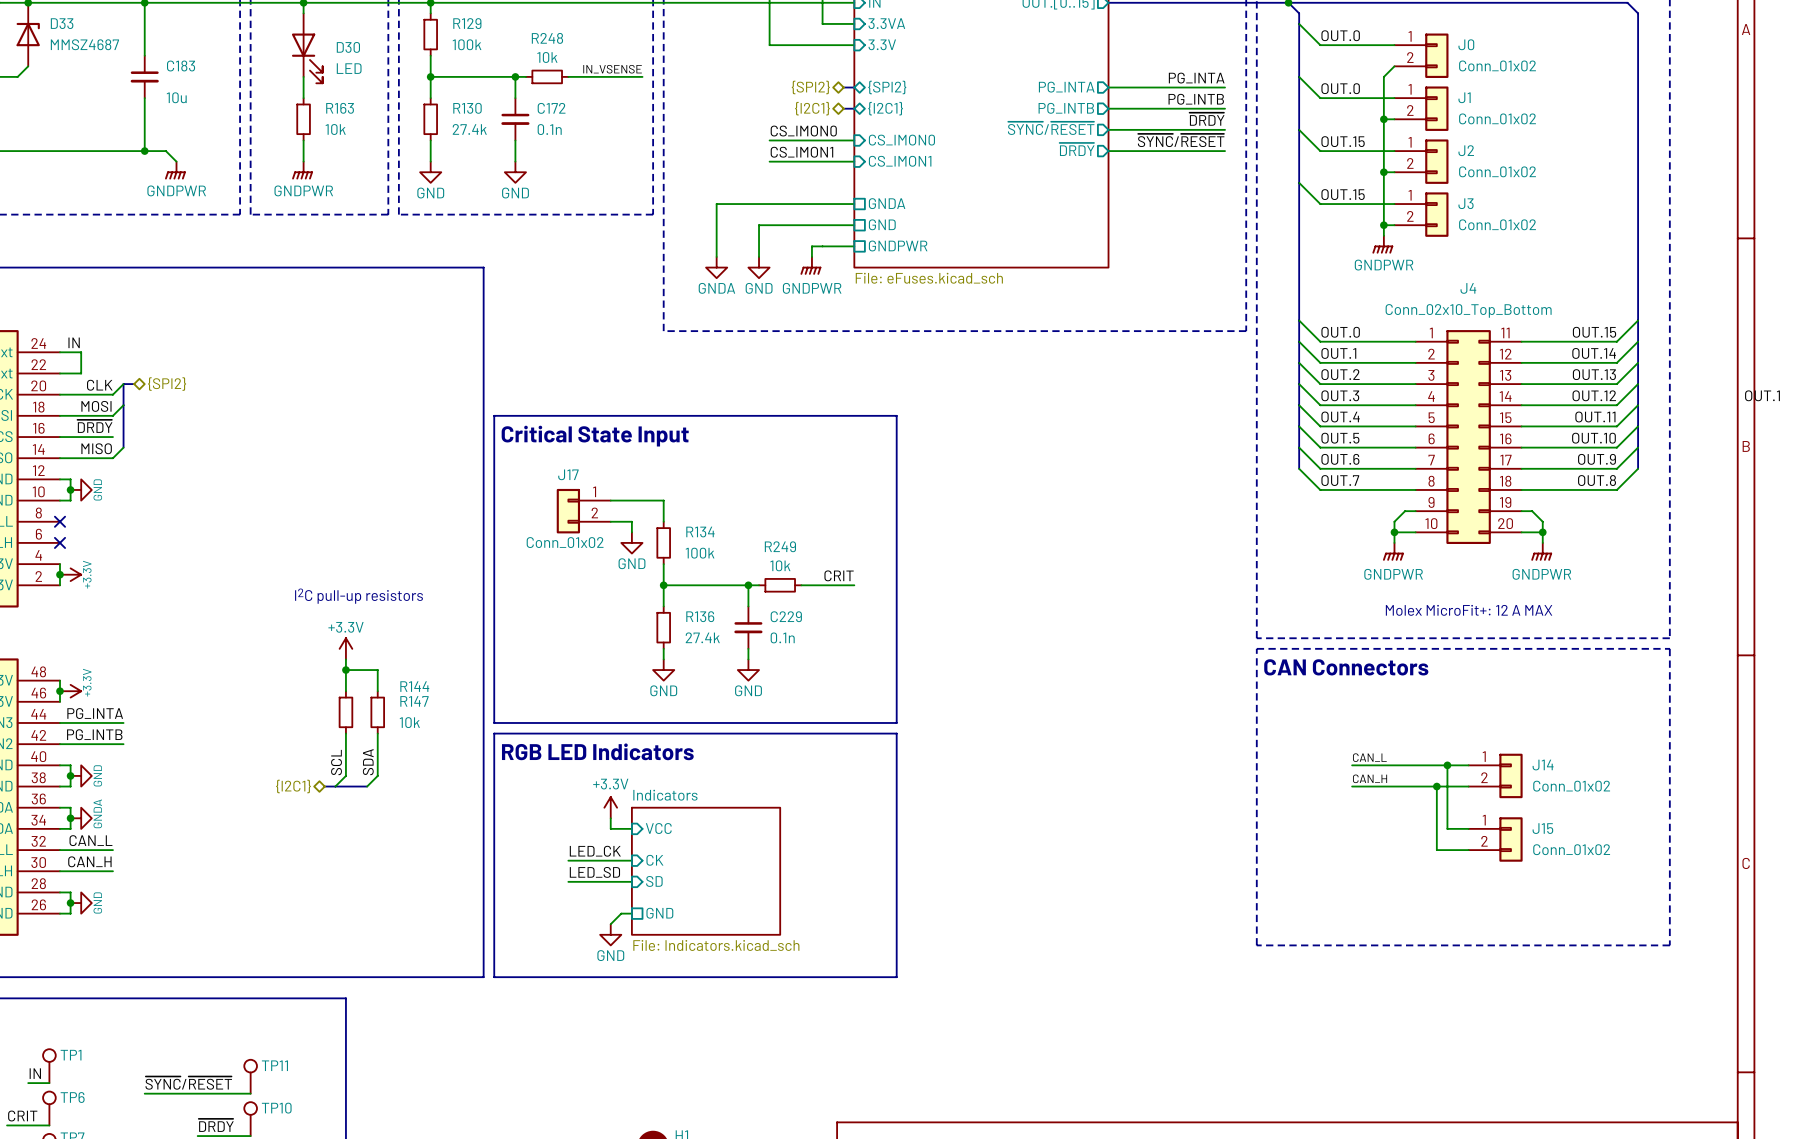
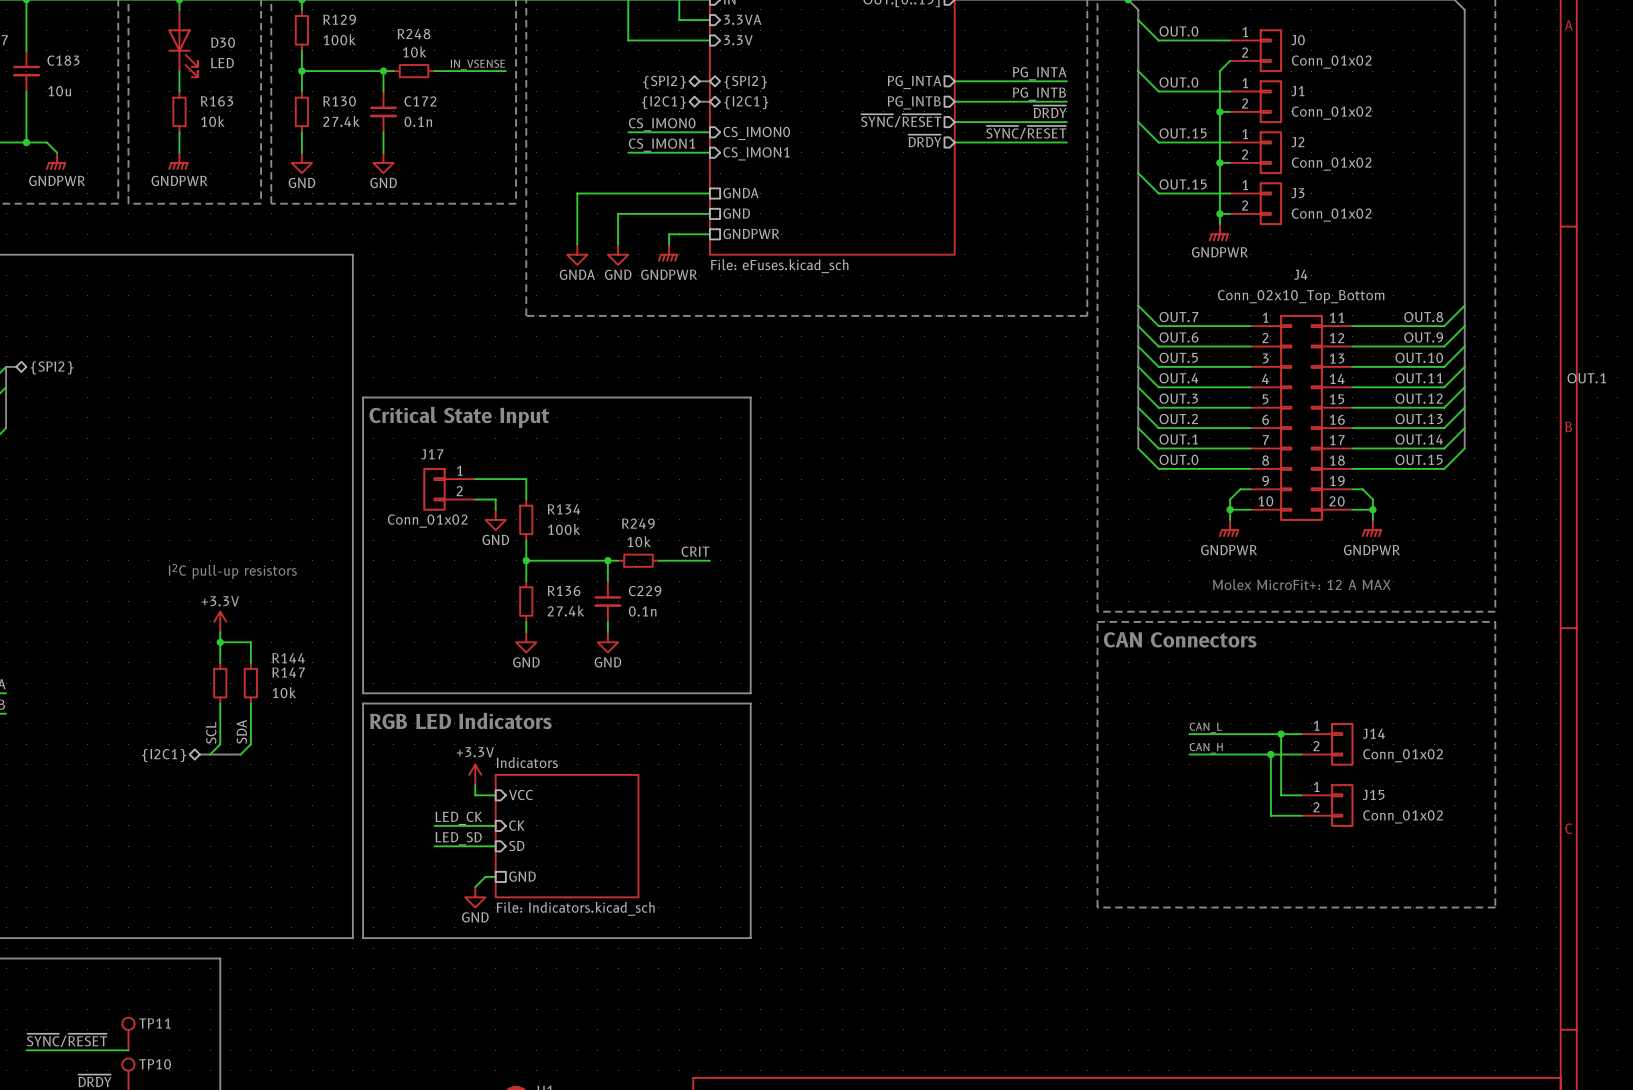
label: OUT.0 (1340, 332) -> OUT.7 (1178, 317)
label: OUT.15 (1594, 332) -> OUT.8 (1423, 317)
label: OUT.1 (1338, 353) -> OUT.6 (1179, 337)
label: OUT.14 (1594, 353) -> OUT.9 (1423, 337)
label: OUT.2 (1340, 374) -> OUT.5 (1178, 357)
label: OUT.13 (1594, 374) -> OUT.10 (1419, 357)
label: OUT.3 (1340, 395) -> OUT.4 (1178, 378)
label: OUT.12 (1594, 395) -> OUT.11 (1419, 378)
label: OUT.4 (1340, 416) -> OUT.3 (1178, 398)
label: OUT.11 (1595, 416) -> OUT.12 (1419, 398)
label: OUT.5 (1340, 438) -> OUT.2 (1178, 419)
label: OUT.10 (1593, 438) -> OUT.13 (1419, 419)
label: OUT.6 (1340, 459) -> OUT.1 (1178, 439)
label: OUT.9 (1596, 459) -> OUT.14 (1419, 439)
label: OUT.7 (1340, 480) -> OUT.0 (1178, 459)
label: OUT.8 (1597, 480) -> OUT.15 (1419, 459)

